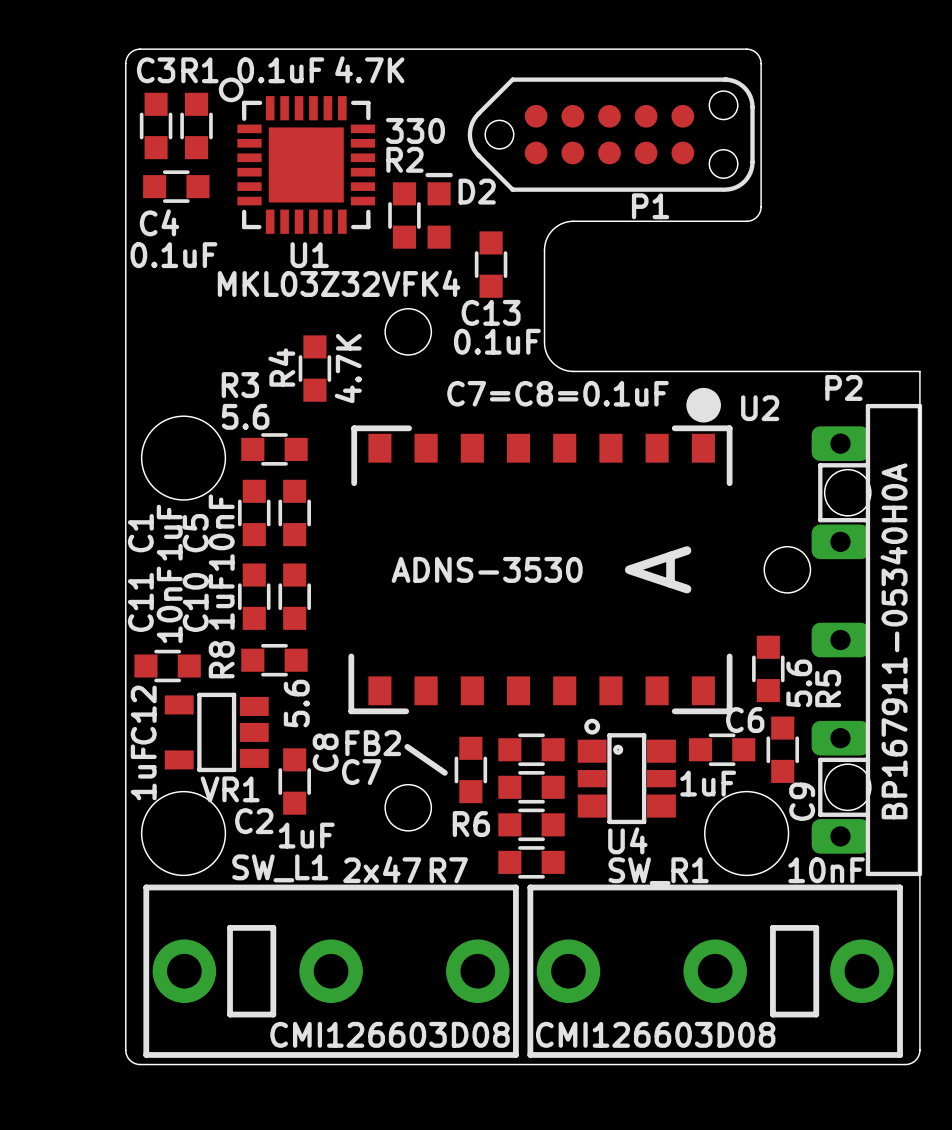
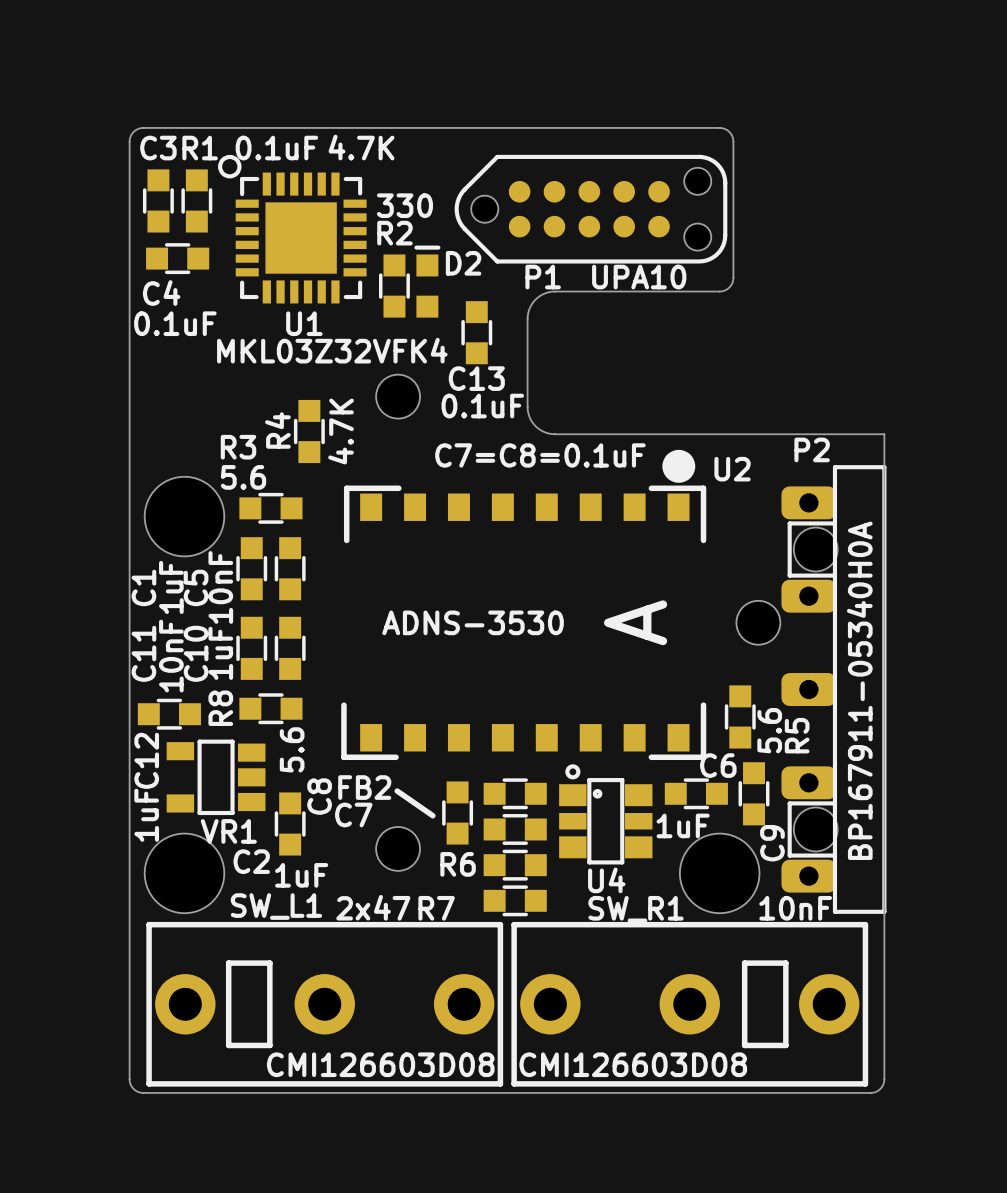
P1 name position: P1 (650, 206) -> P1 (543, 277)
text: none -> UPA10 (639, 277)

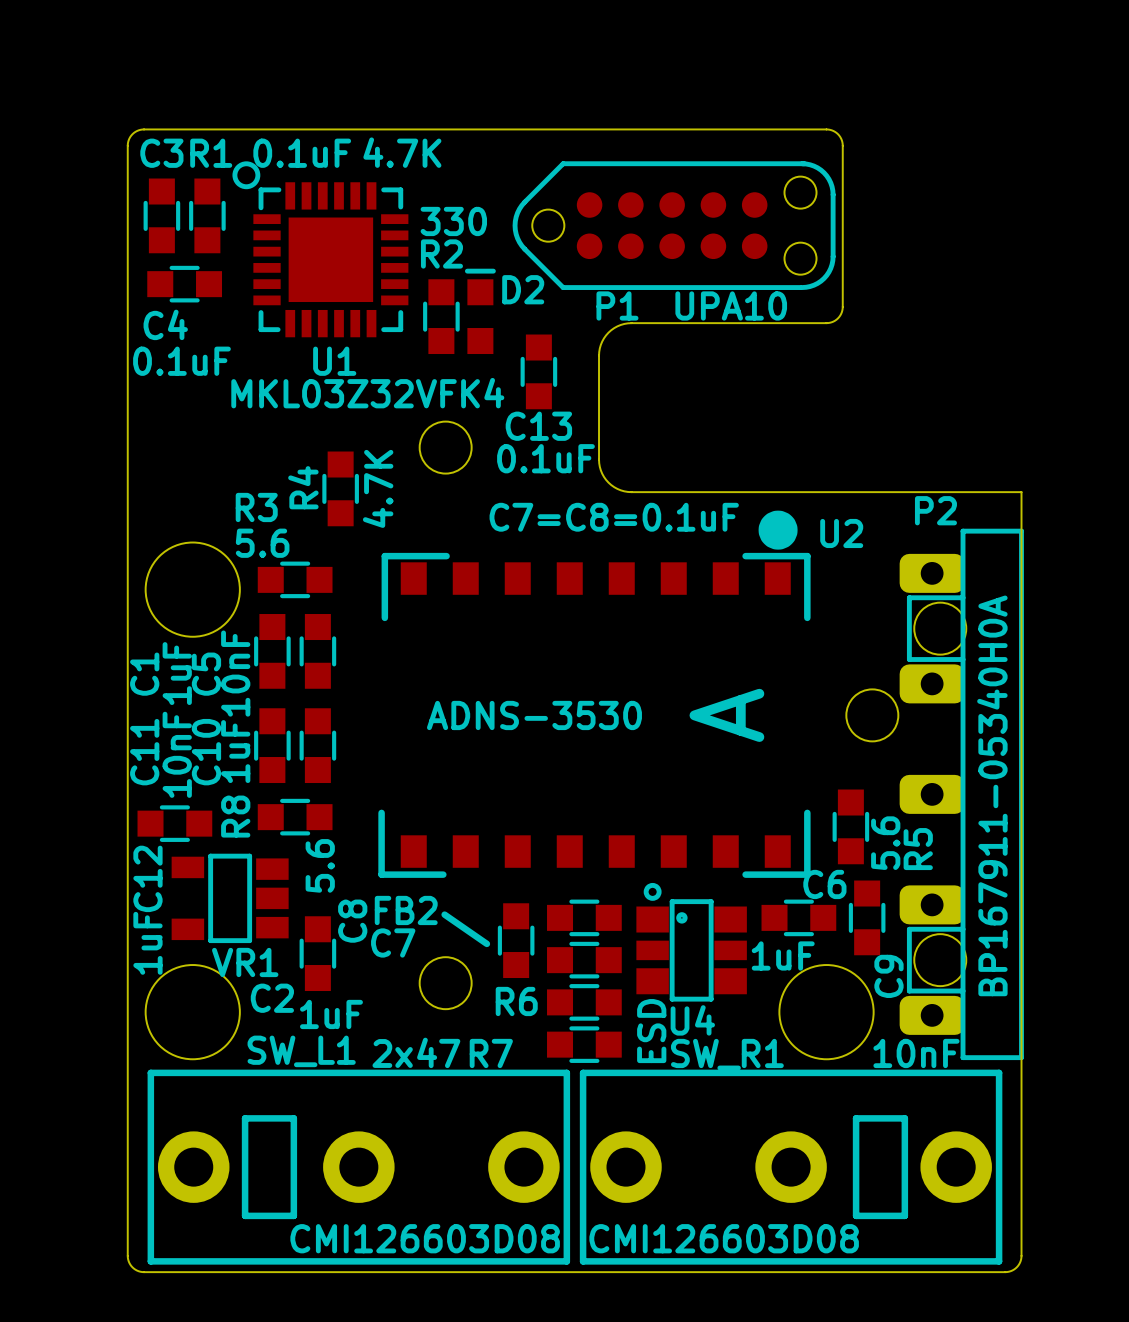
U4 value: none -> ESD (651, 1031)

